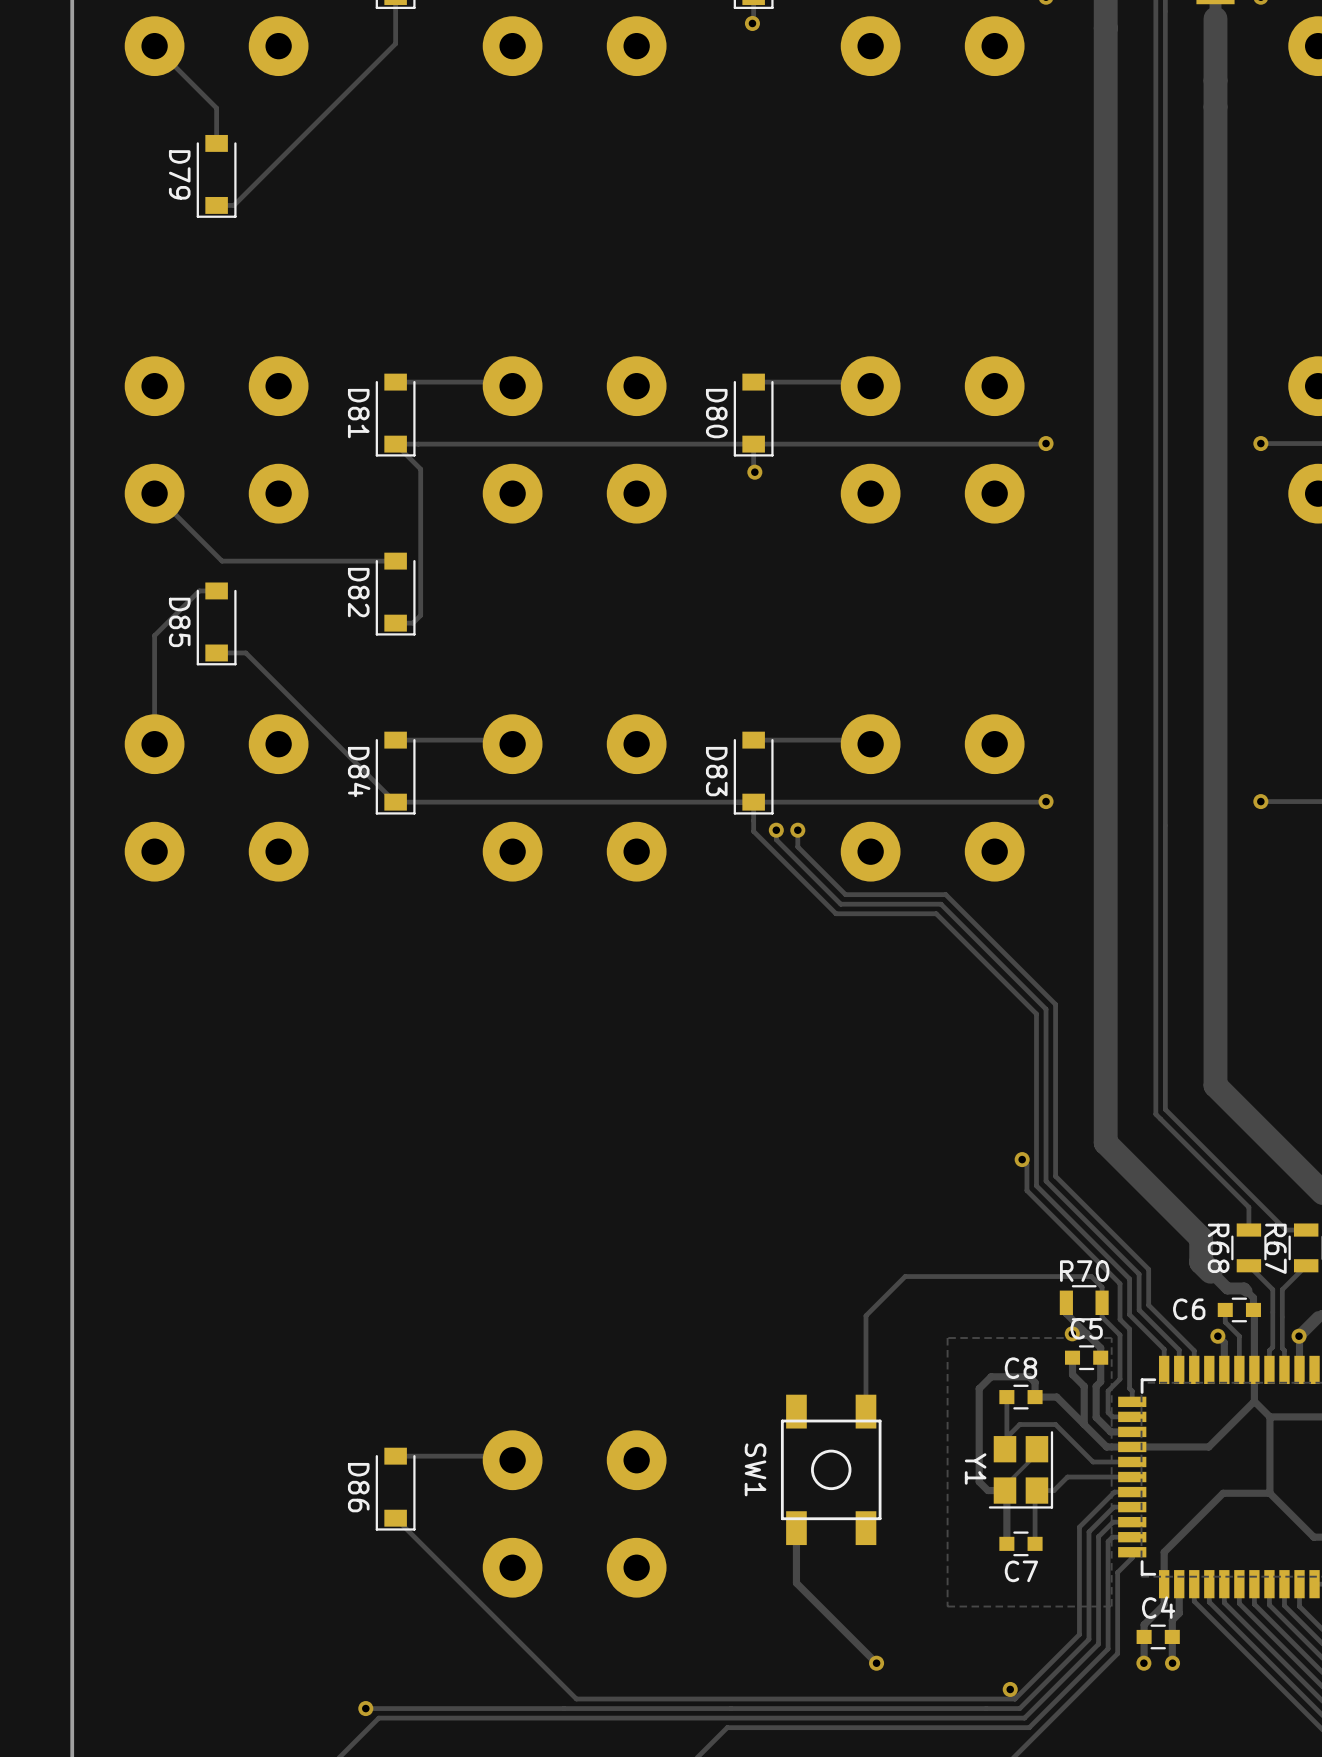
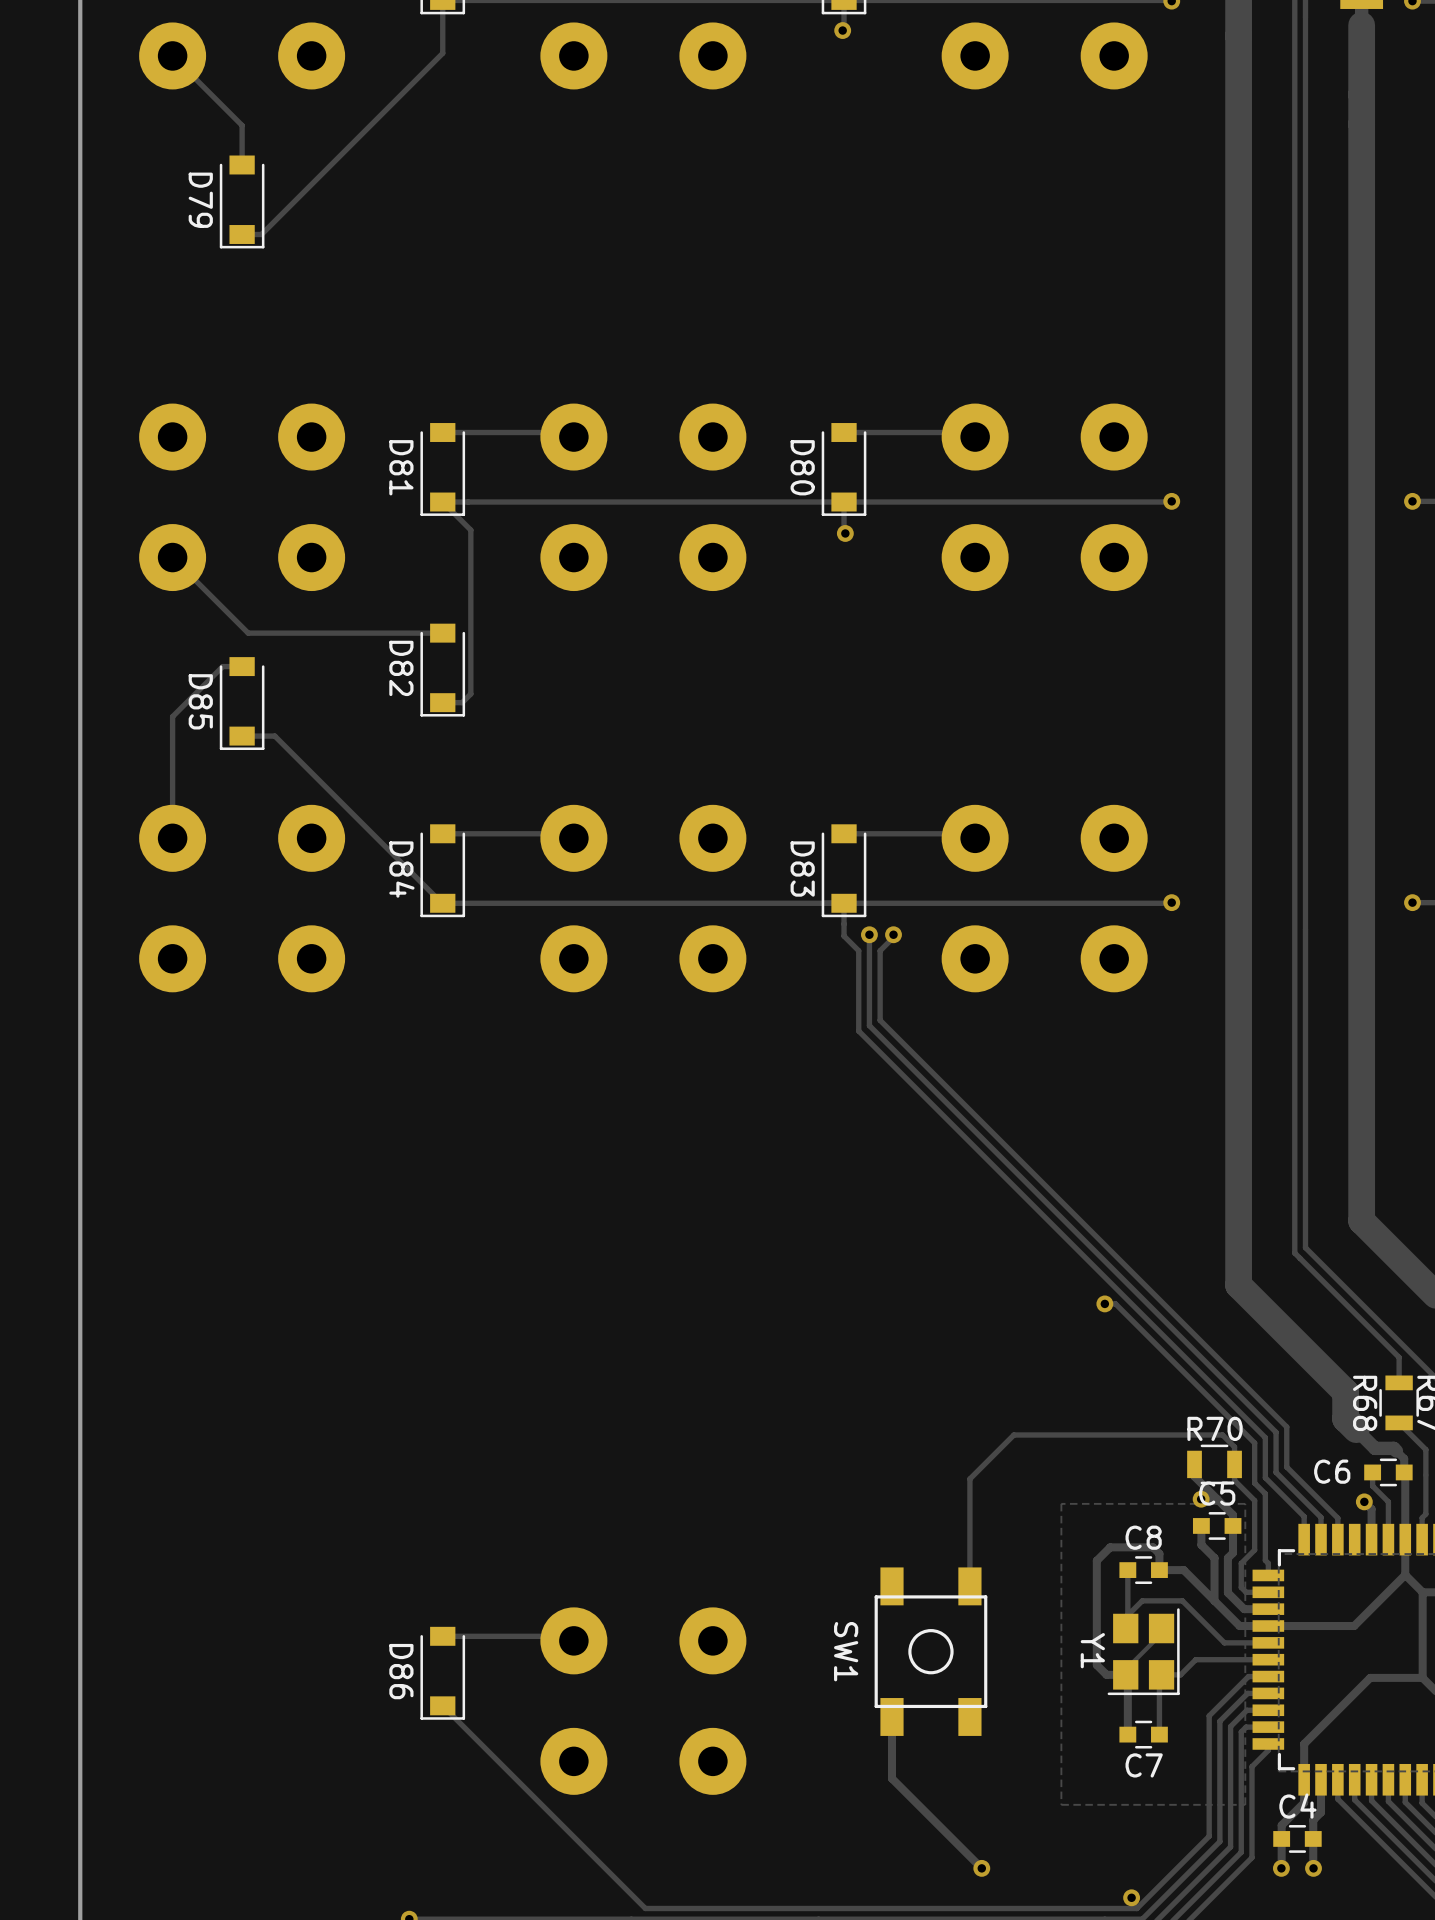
track: (797, 832) (797, 846) (845, 894) (945, 894) (1055, 1004) (1055, 1176) -> (893, 937) (880, 950) (880, 1020) (1182, 1322)
track: (776, 839) (840, 904) (941, 904) (1046, 1009) (1046, 1181) -> (869, 945) (869, 1025) (1171, 1327)
track: (766, 844) (835, 913) (936, 913) (1036, 1013) (1036, 1185) -> (858, 950) (858, 1031) (1161, 1333)
track: (1022, 1159) (1026, 1164) (1026, 1190) -> (1104, 1303) (1115, 1303) (1150, 1338)
via position: (1022, 1159) -> (1104, 1303)

